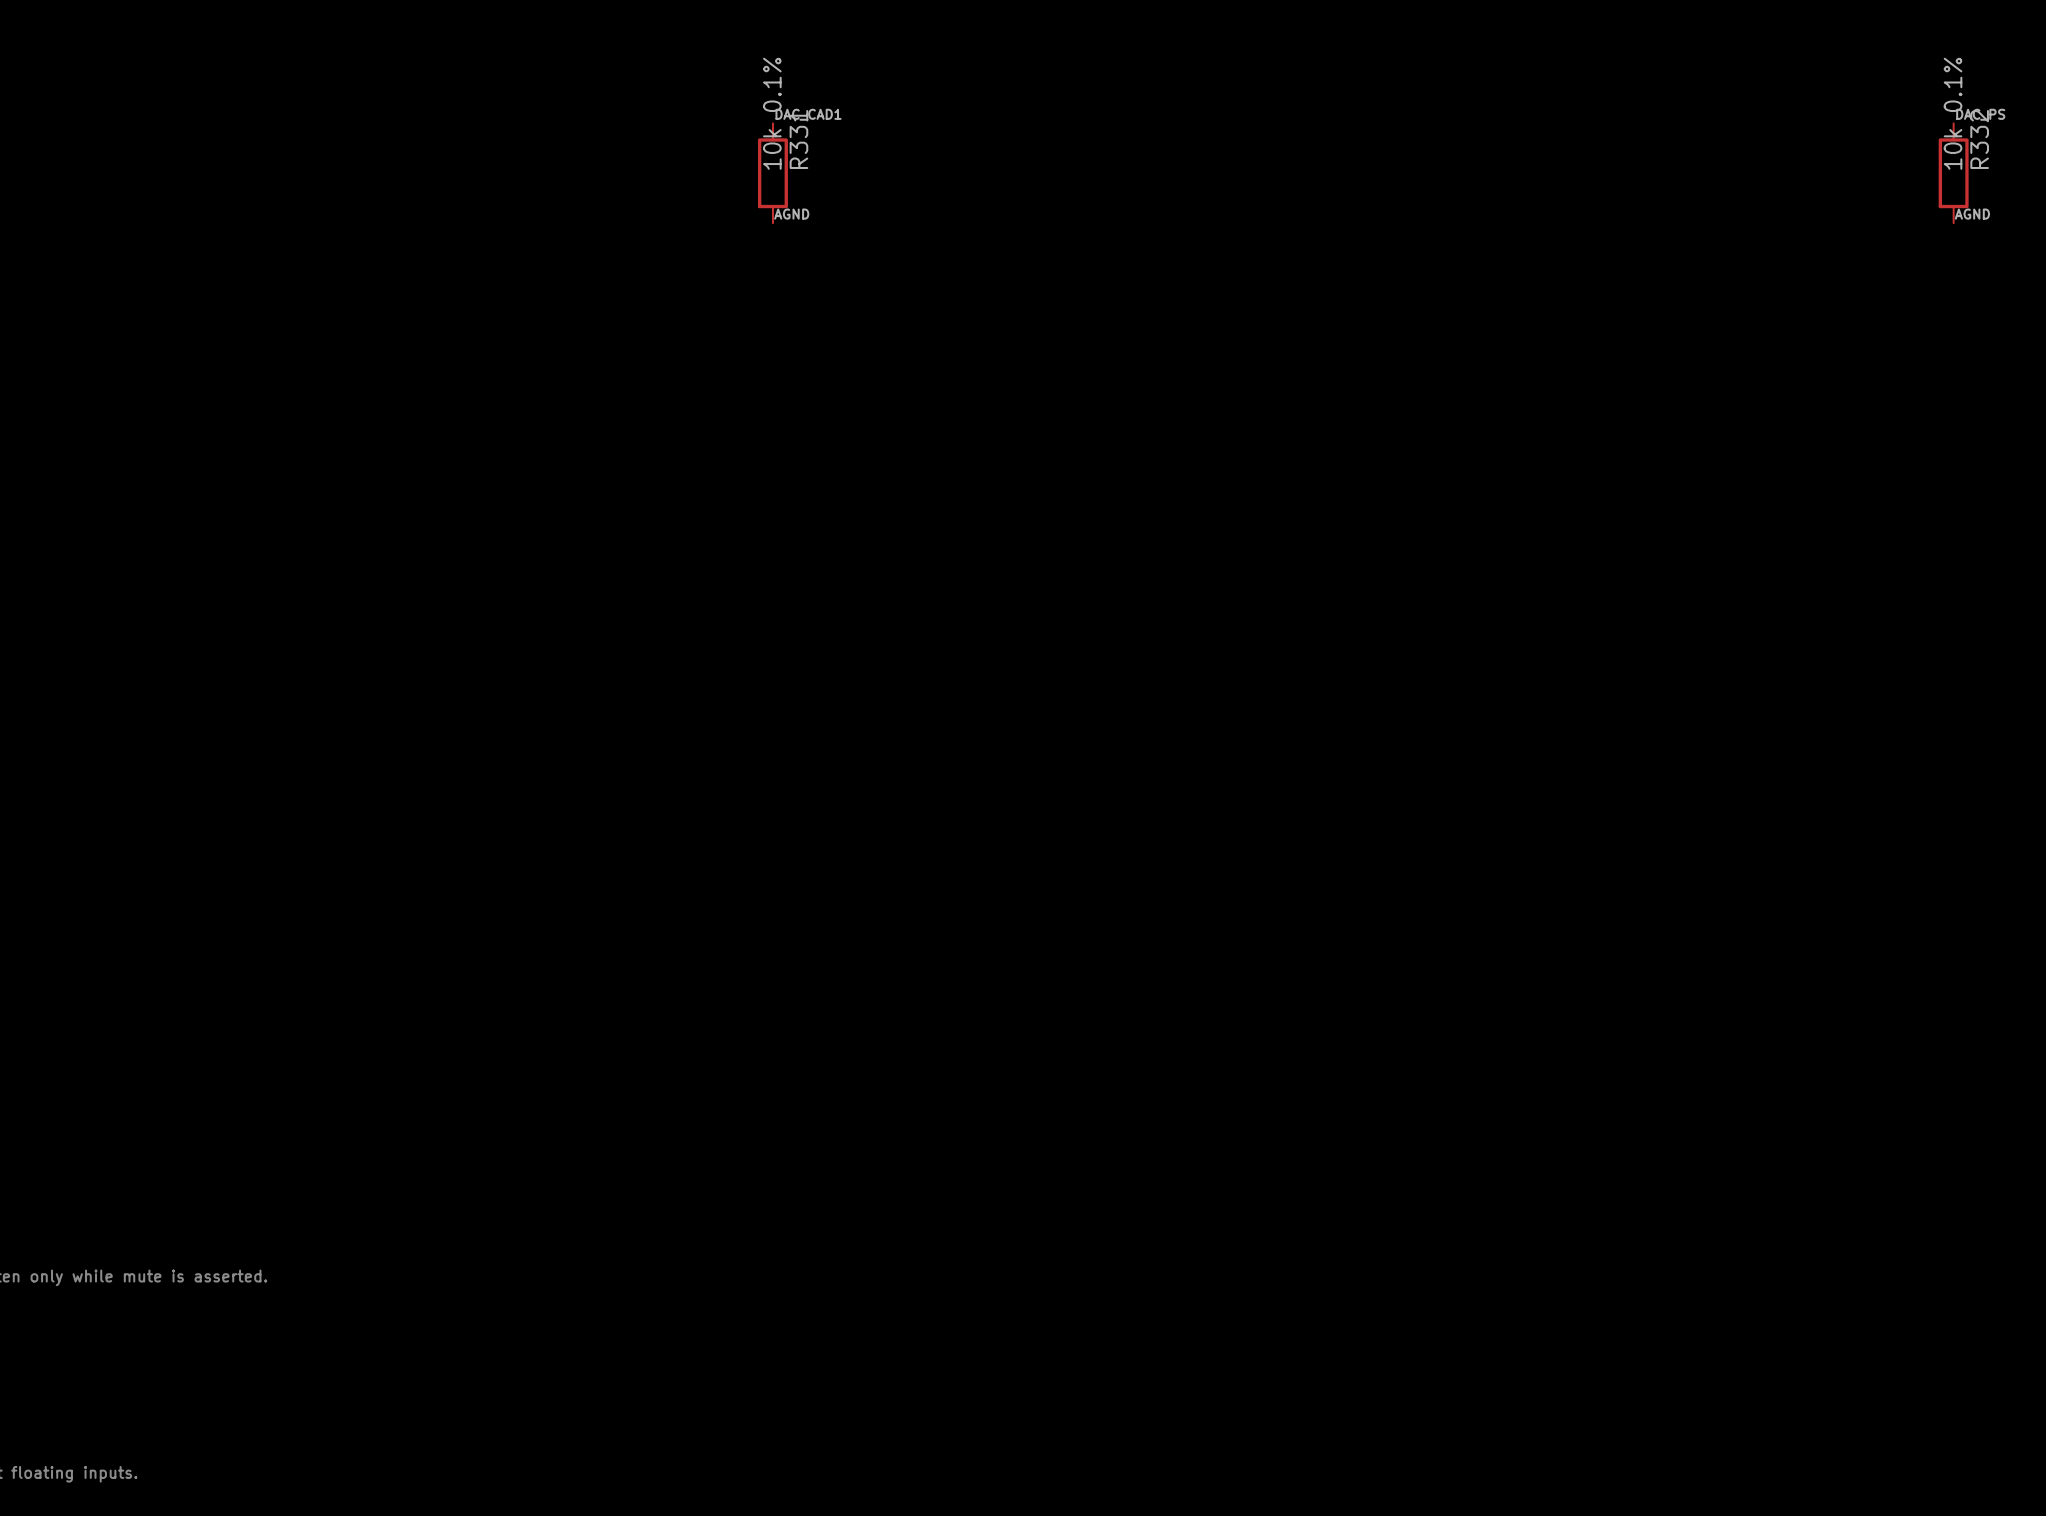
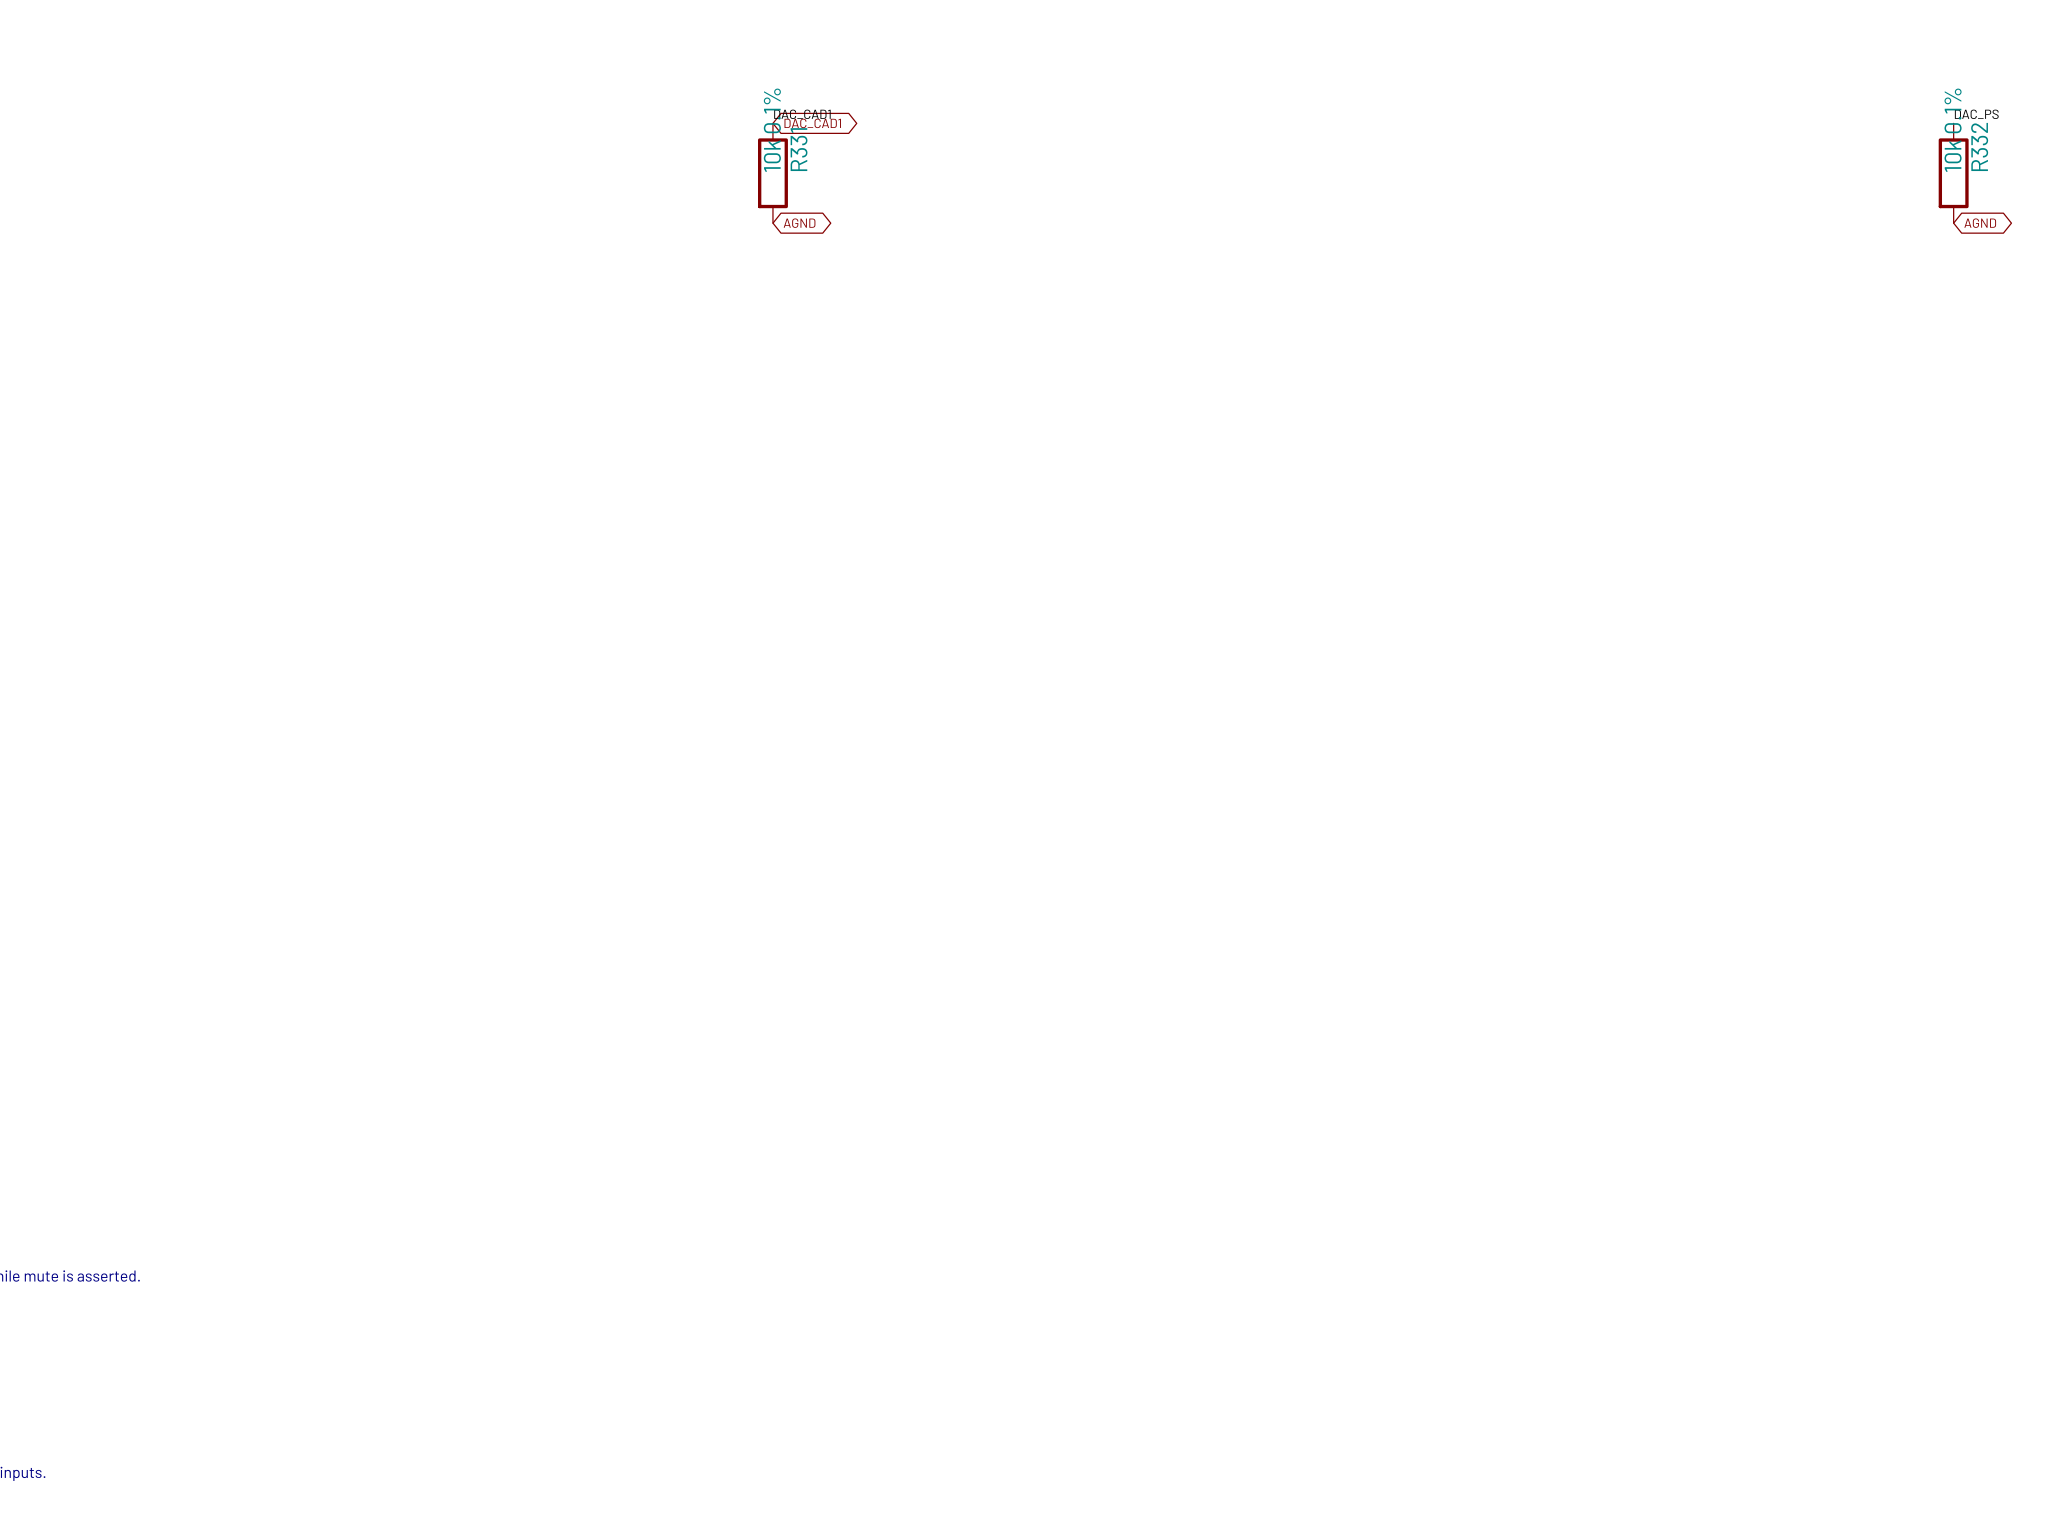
global label: none -> DAC_CAD1 (812, 123)
label: AGND (791, 214) -> none
label: AGND (1972, 214) -> none
global label: none -> AGND (799, 223)
global label: none -> AGND (1980, 223)

